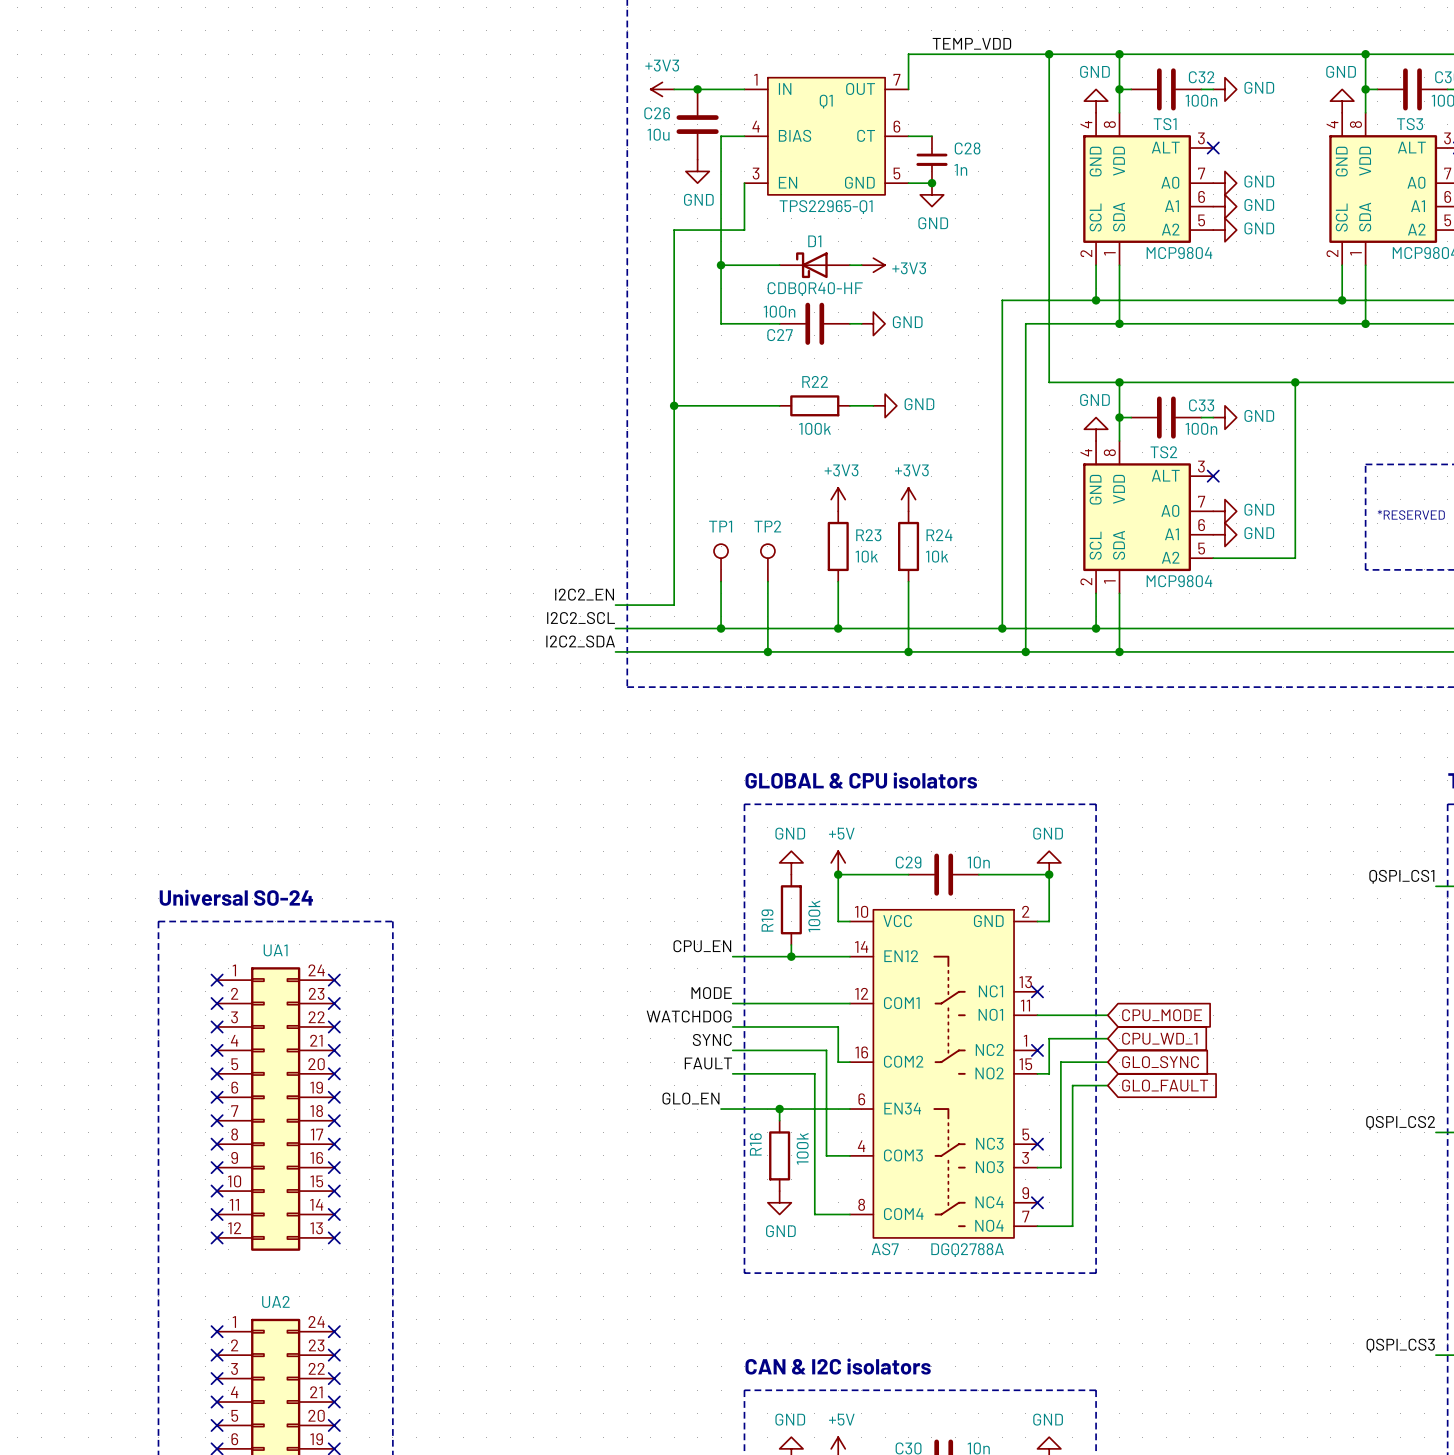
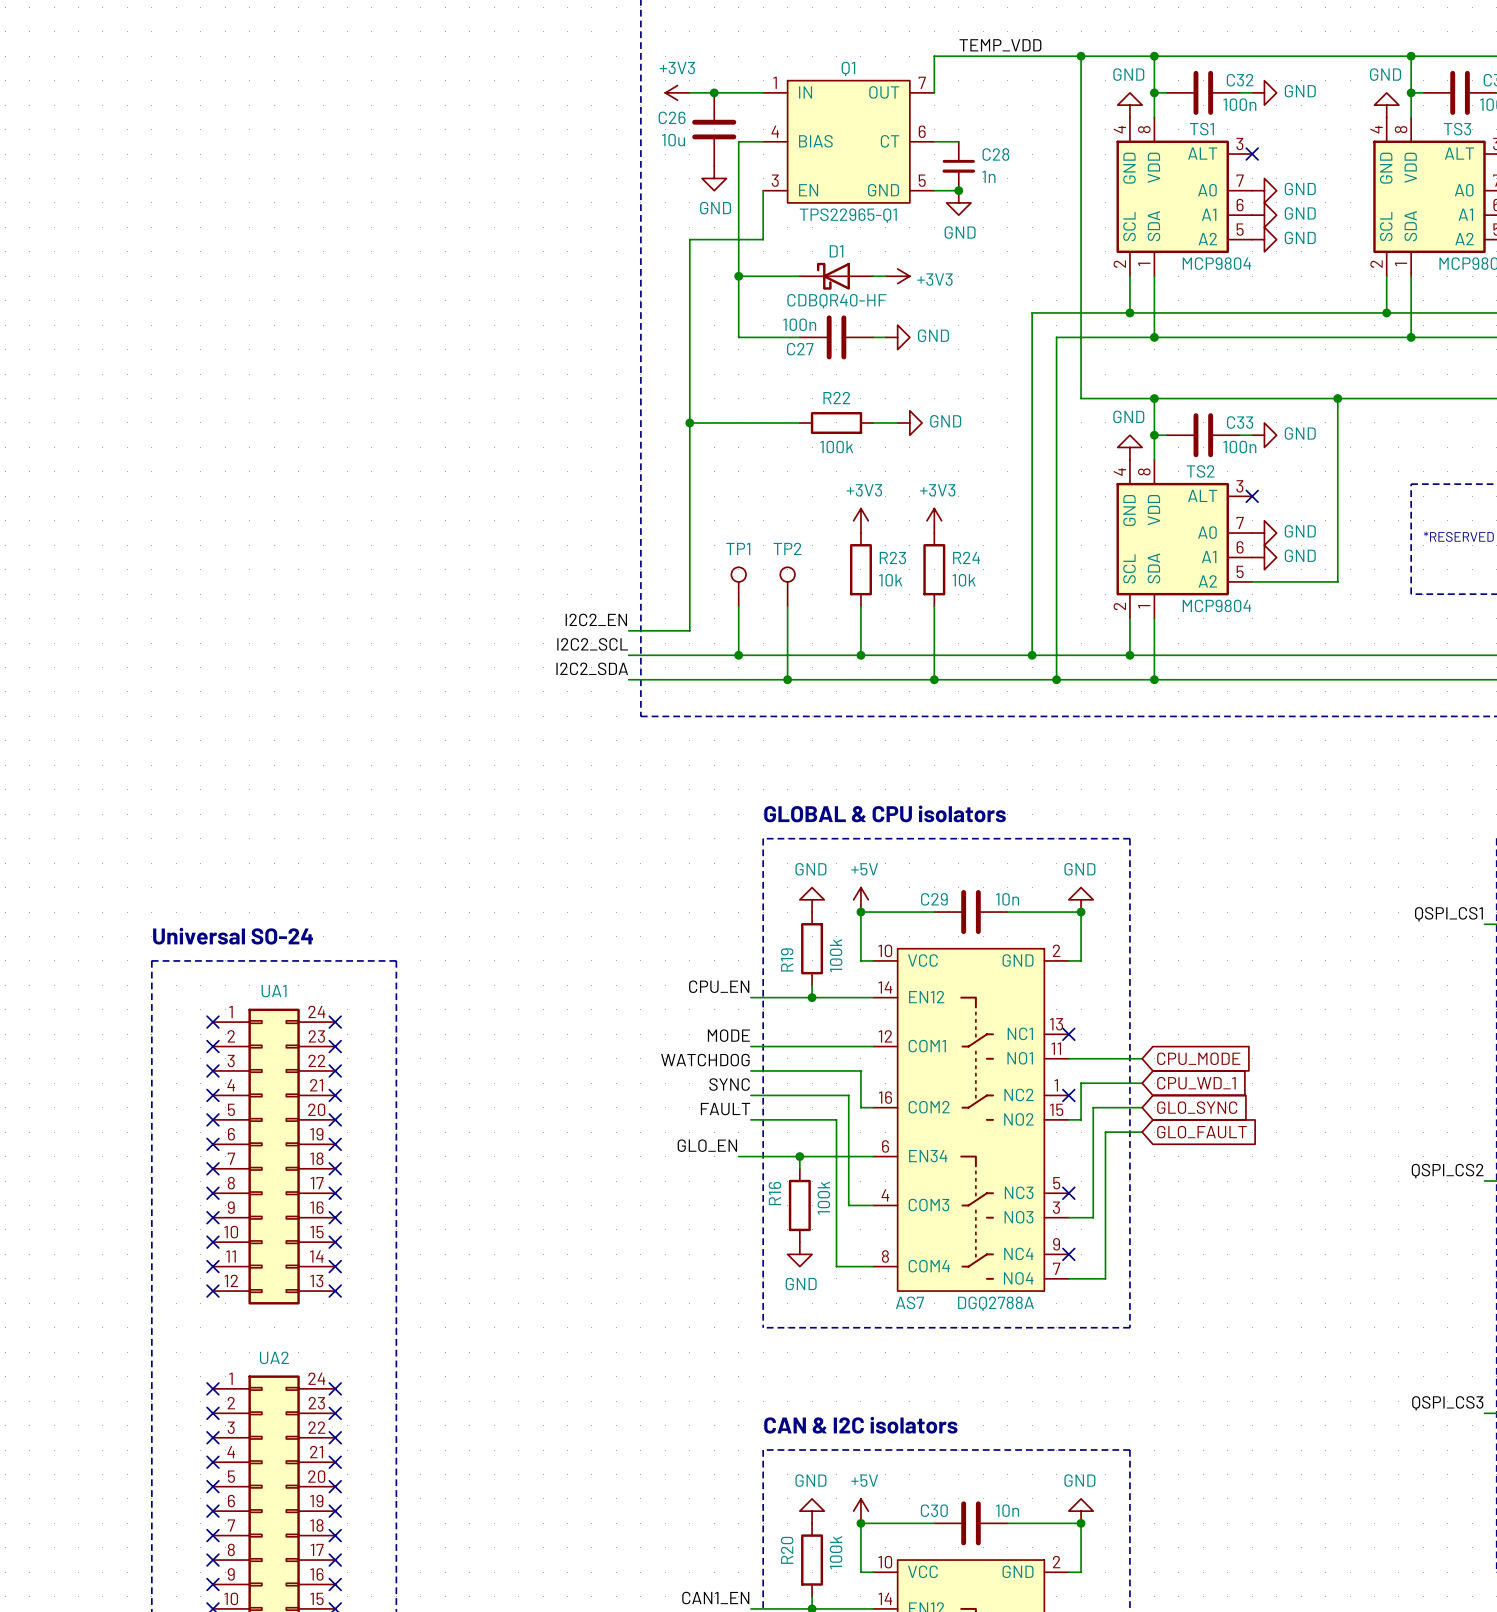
Q1 name position: Q1 (826, 101) -> Q1 (848, 68)

